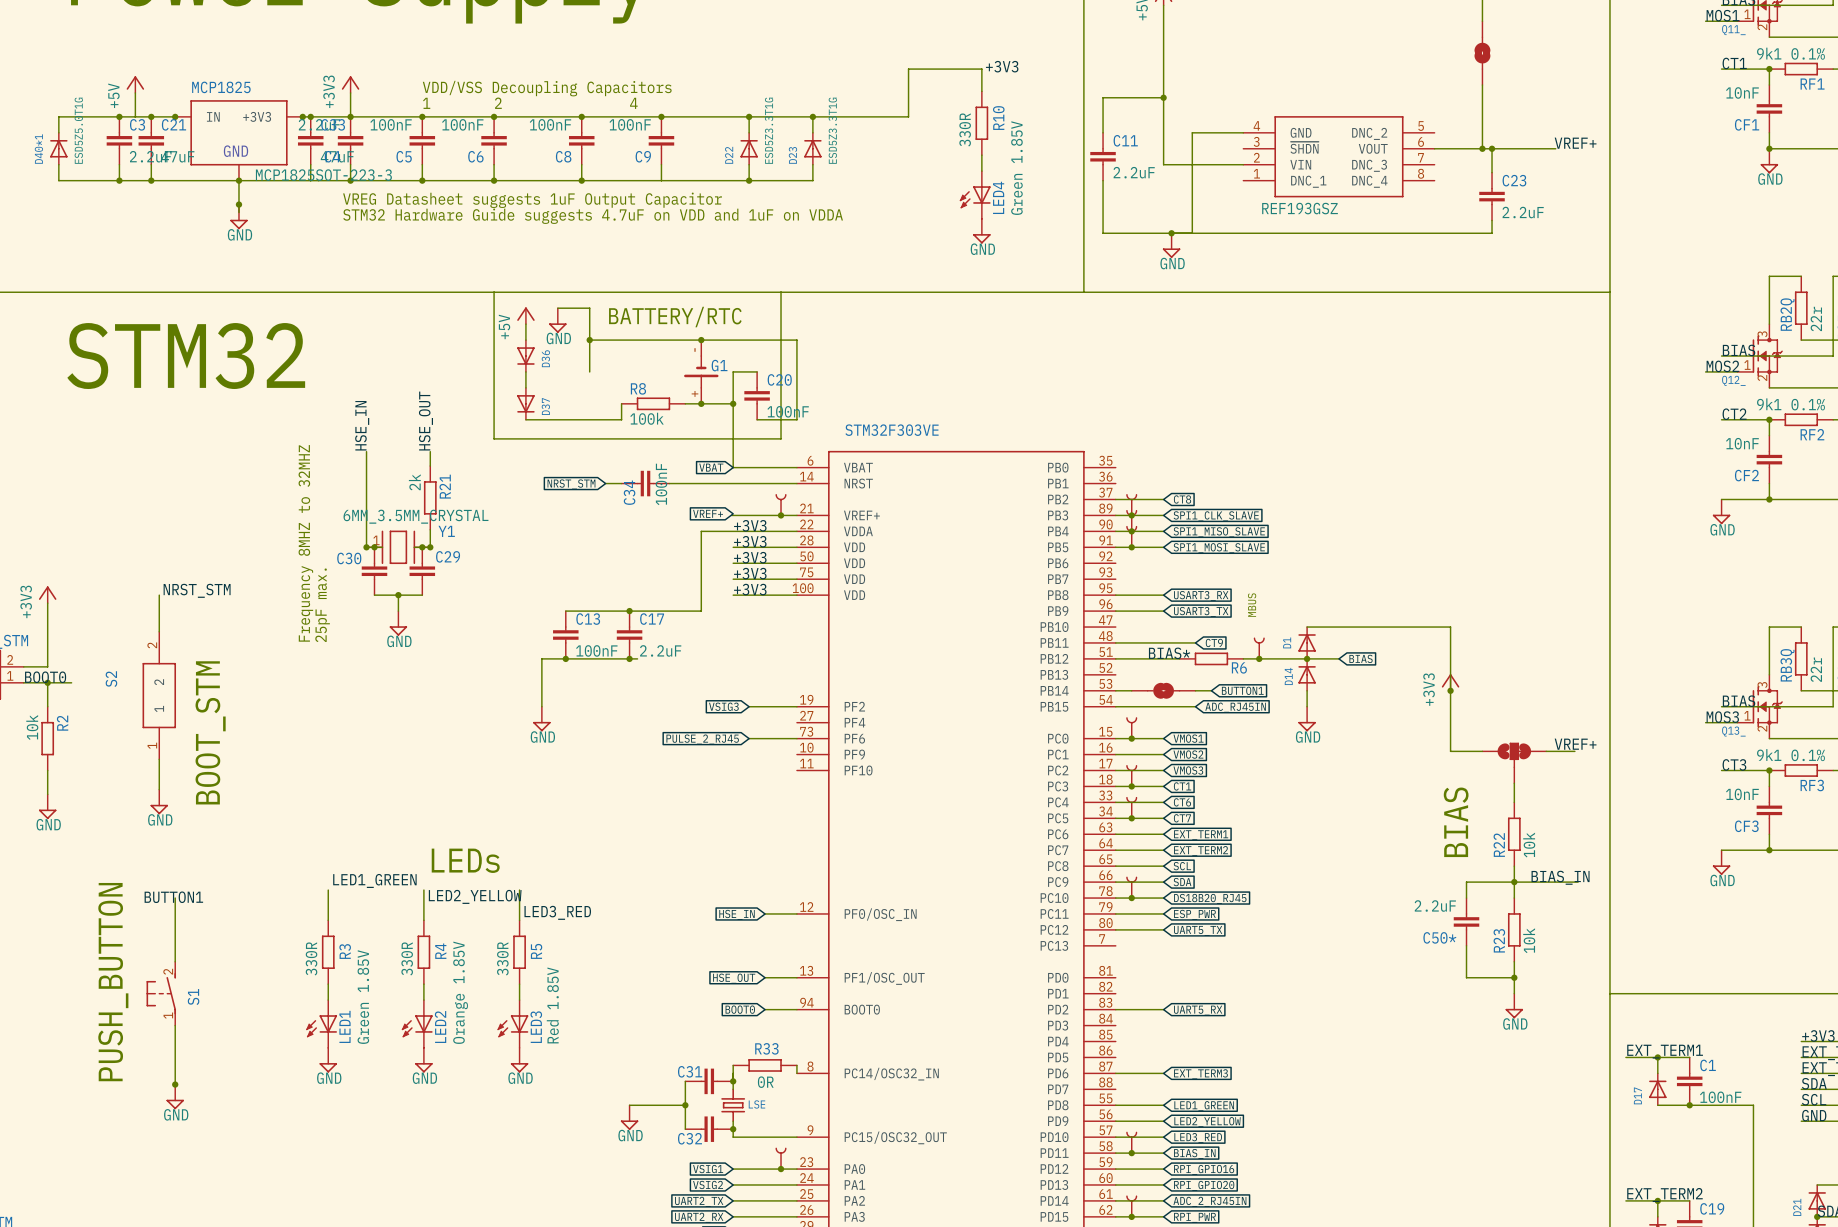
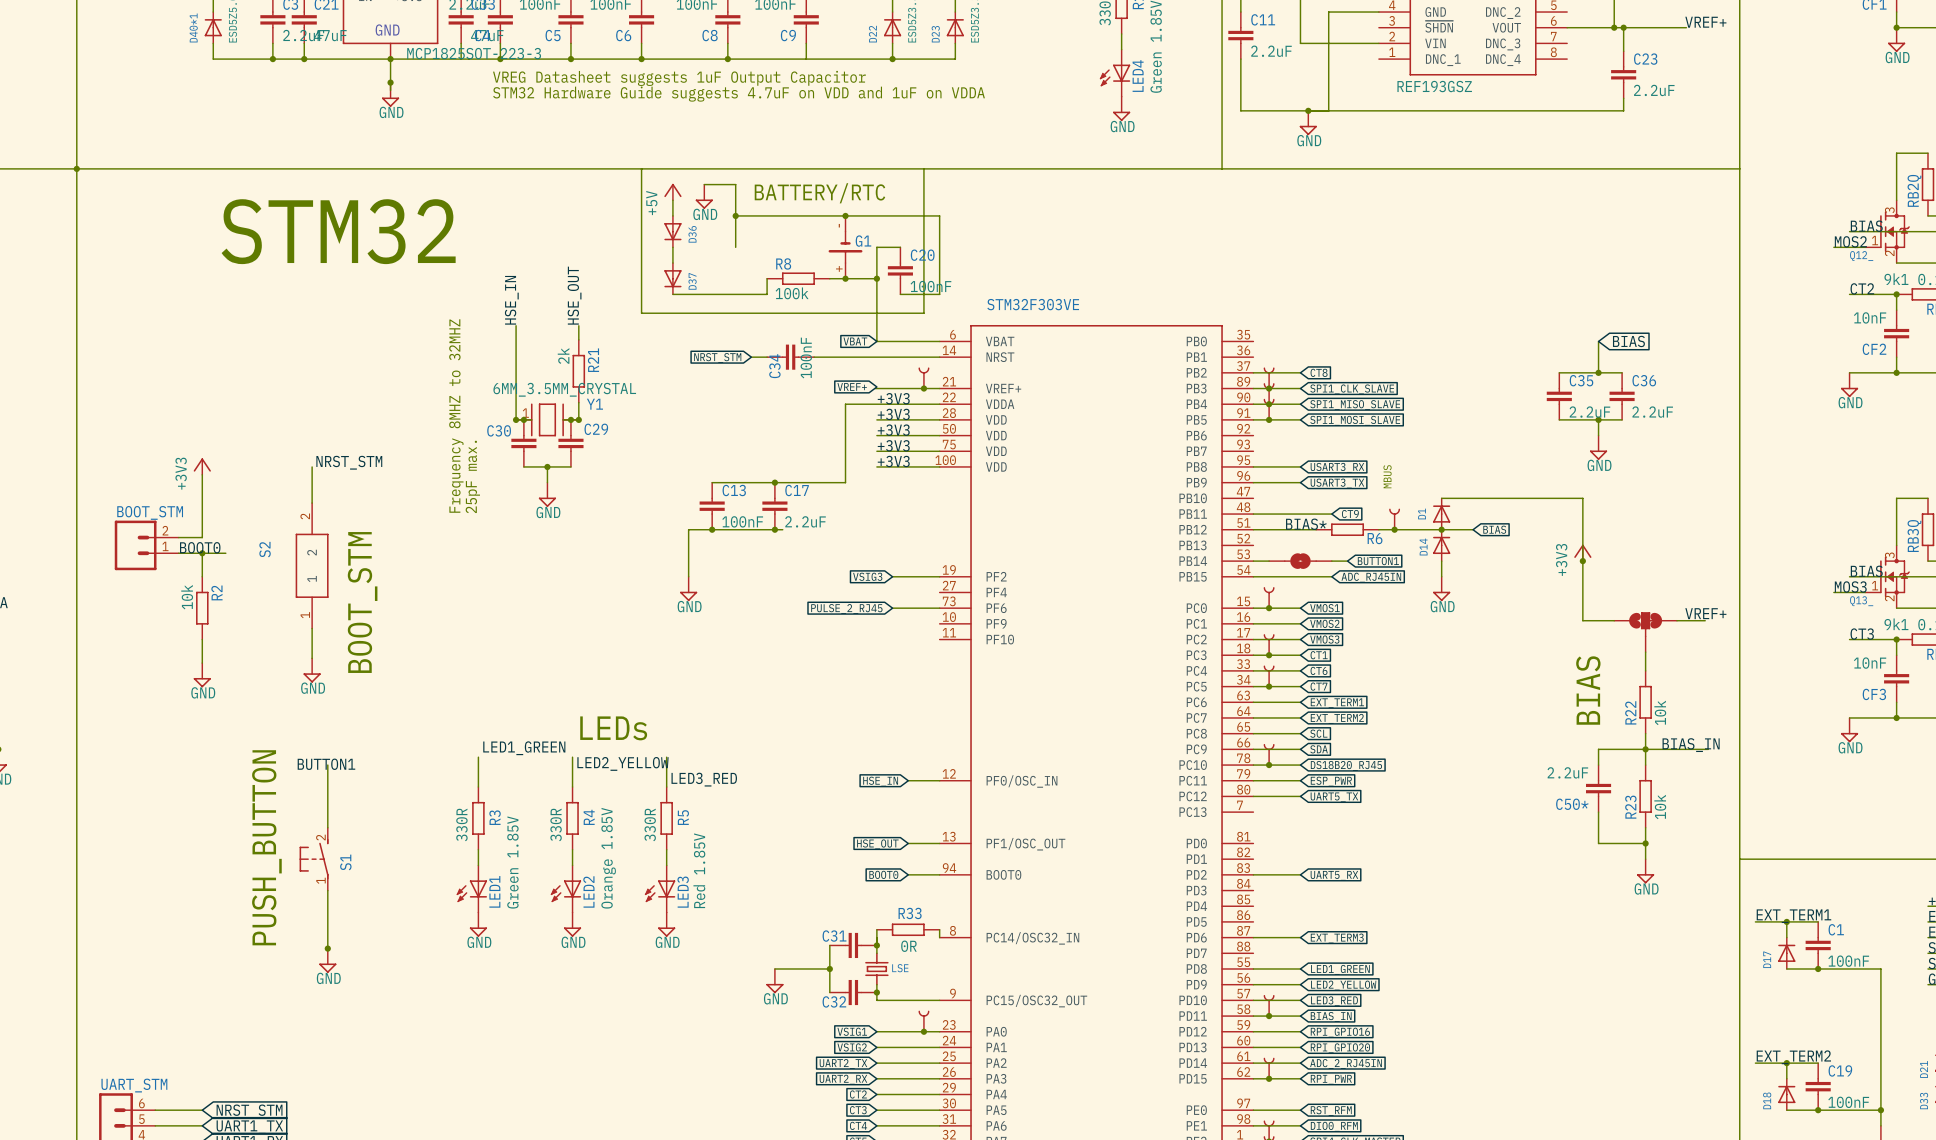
wire: none -> (1598, 341) (1598, 372)
global label: none -> BIAS (1628, 341)
wire: none -> (1559, 372) (1622, 372)
junction: none -> (1598, 372)
C35: none -> 2.2uF (1559, 396)
C36: none -> 2.2uF (1622, 396)
wire: none -> (1559, 419) (1622, 419)
wire: none -> (1598, 419) (1598, 435)
junction: none -> (1598, 419)
power symbol: none -> GND (1598, 447)

